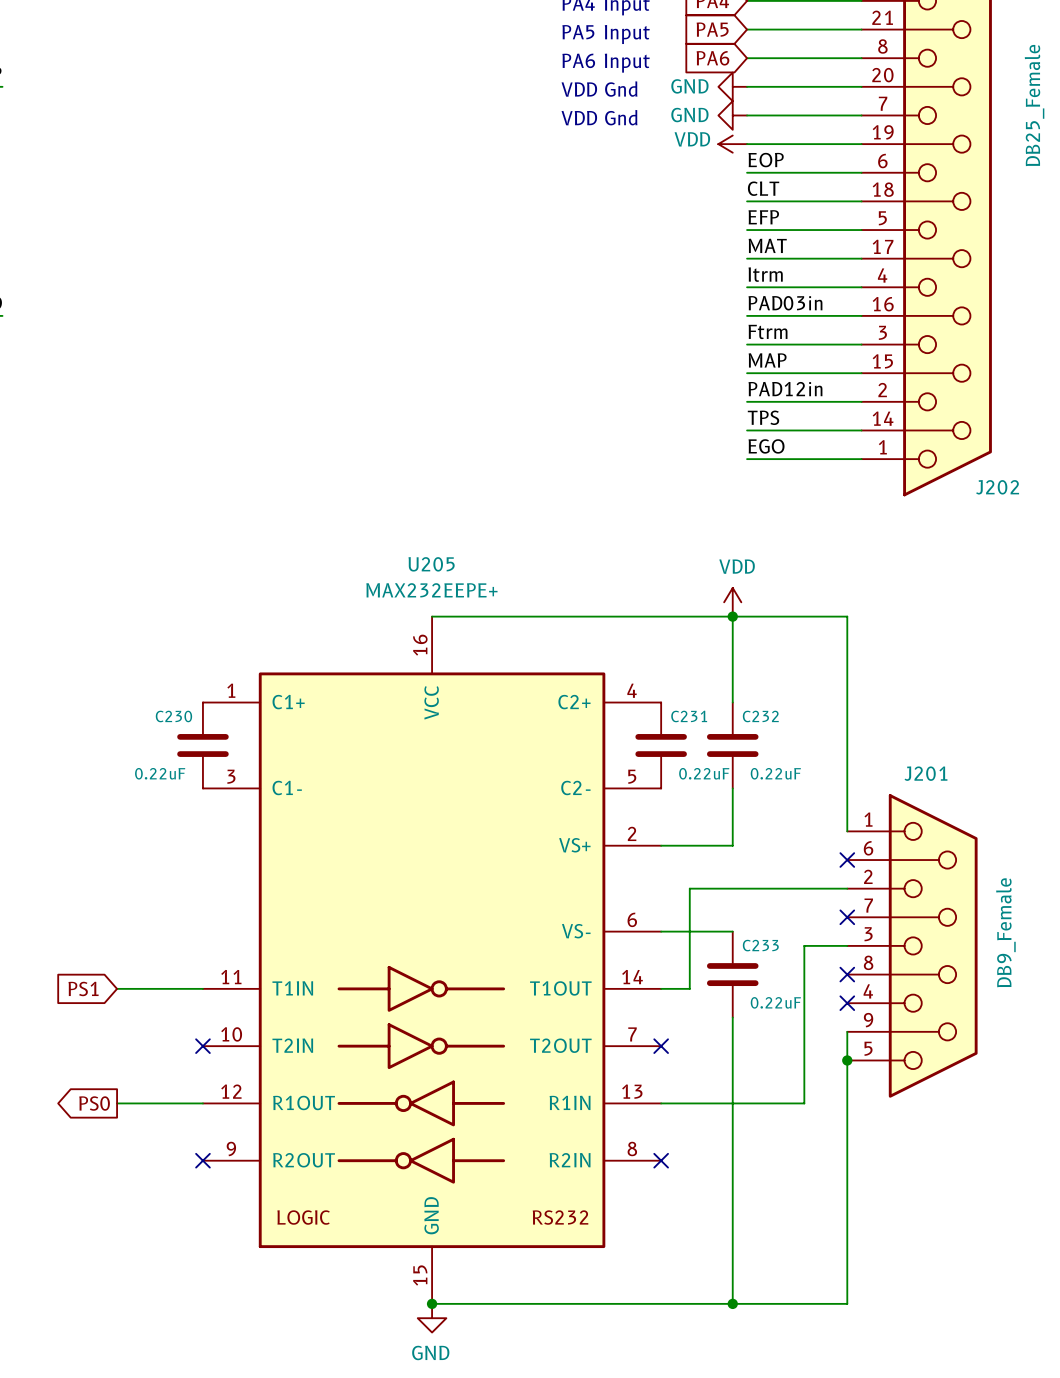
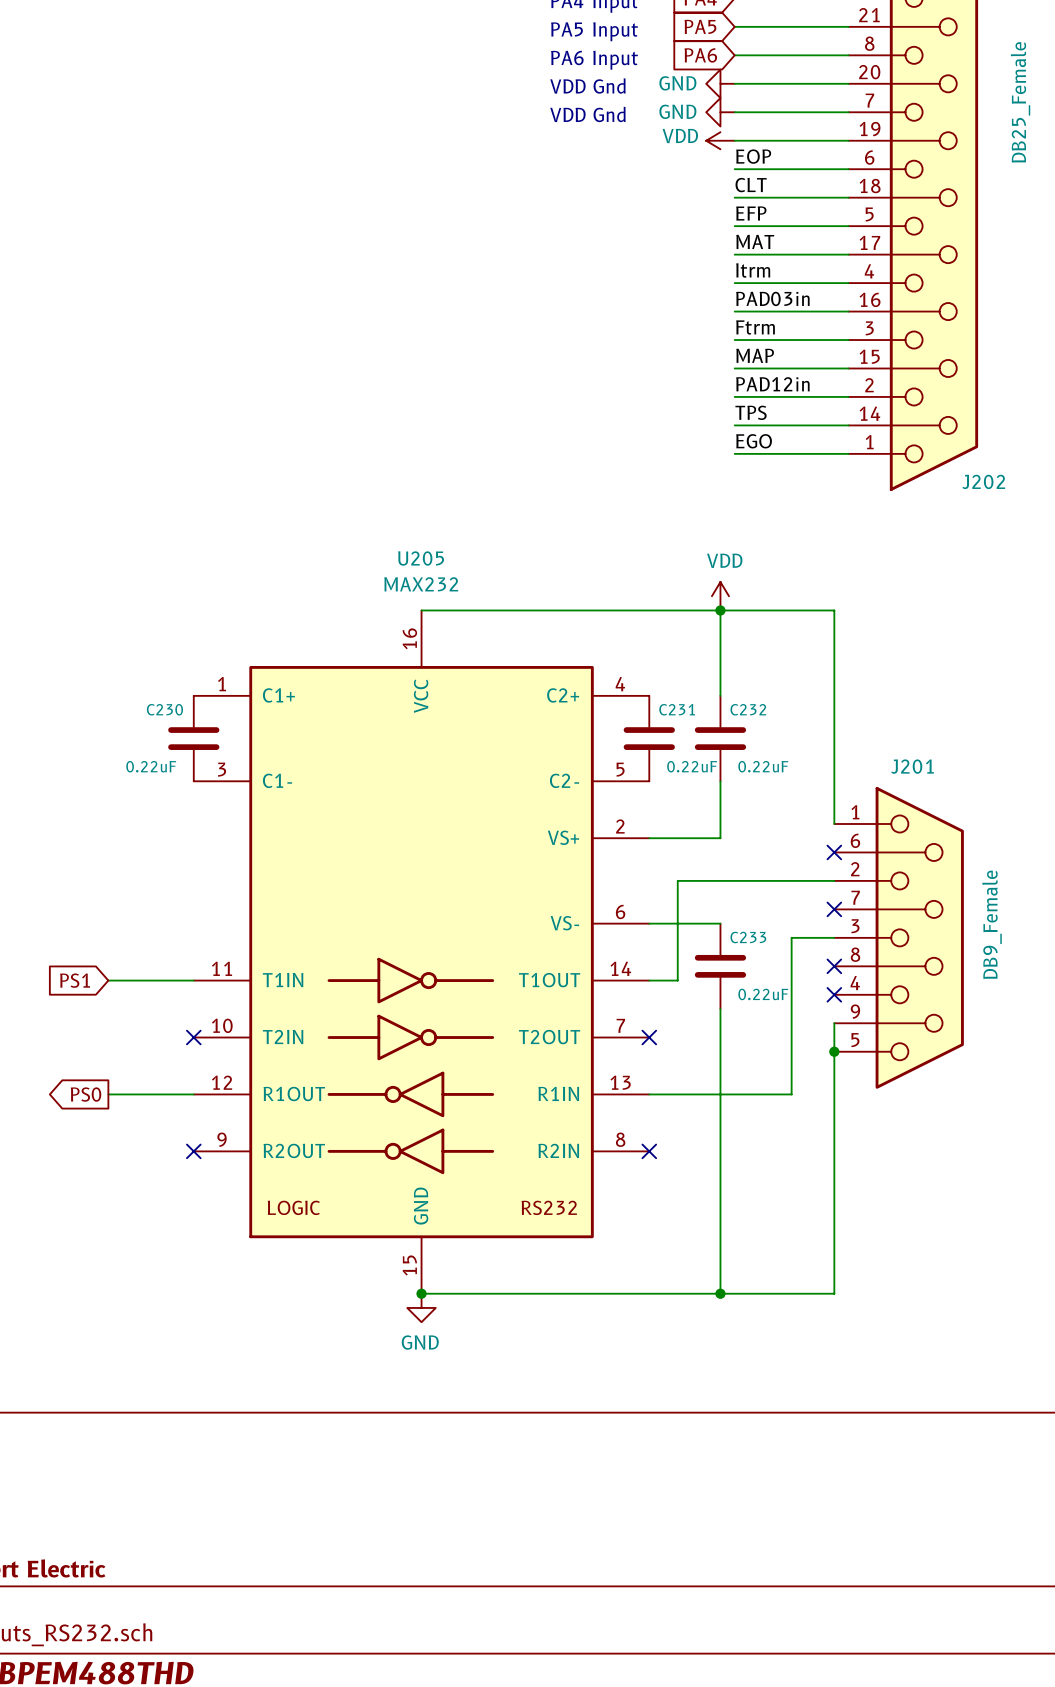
U205 value: MAX232EEPE+ (431, 590) -> MAX232 (421, 584)

